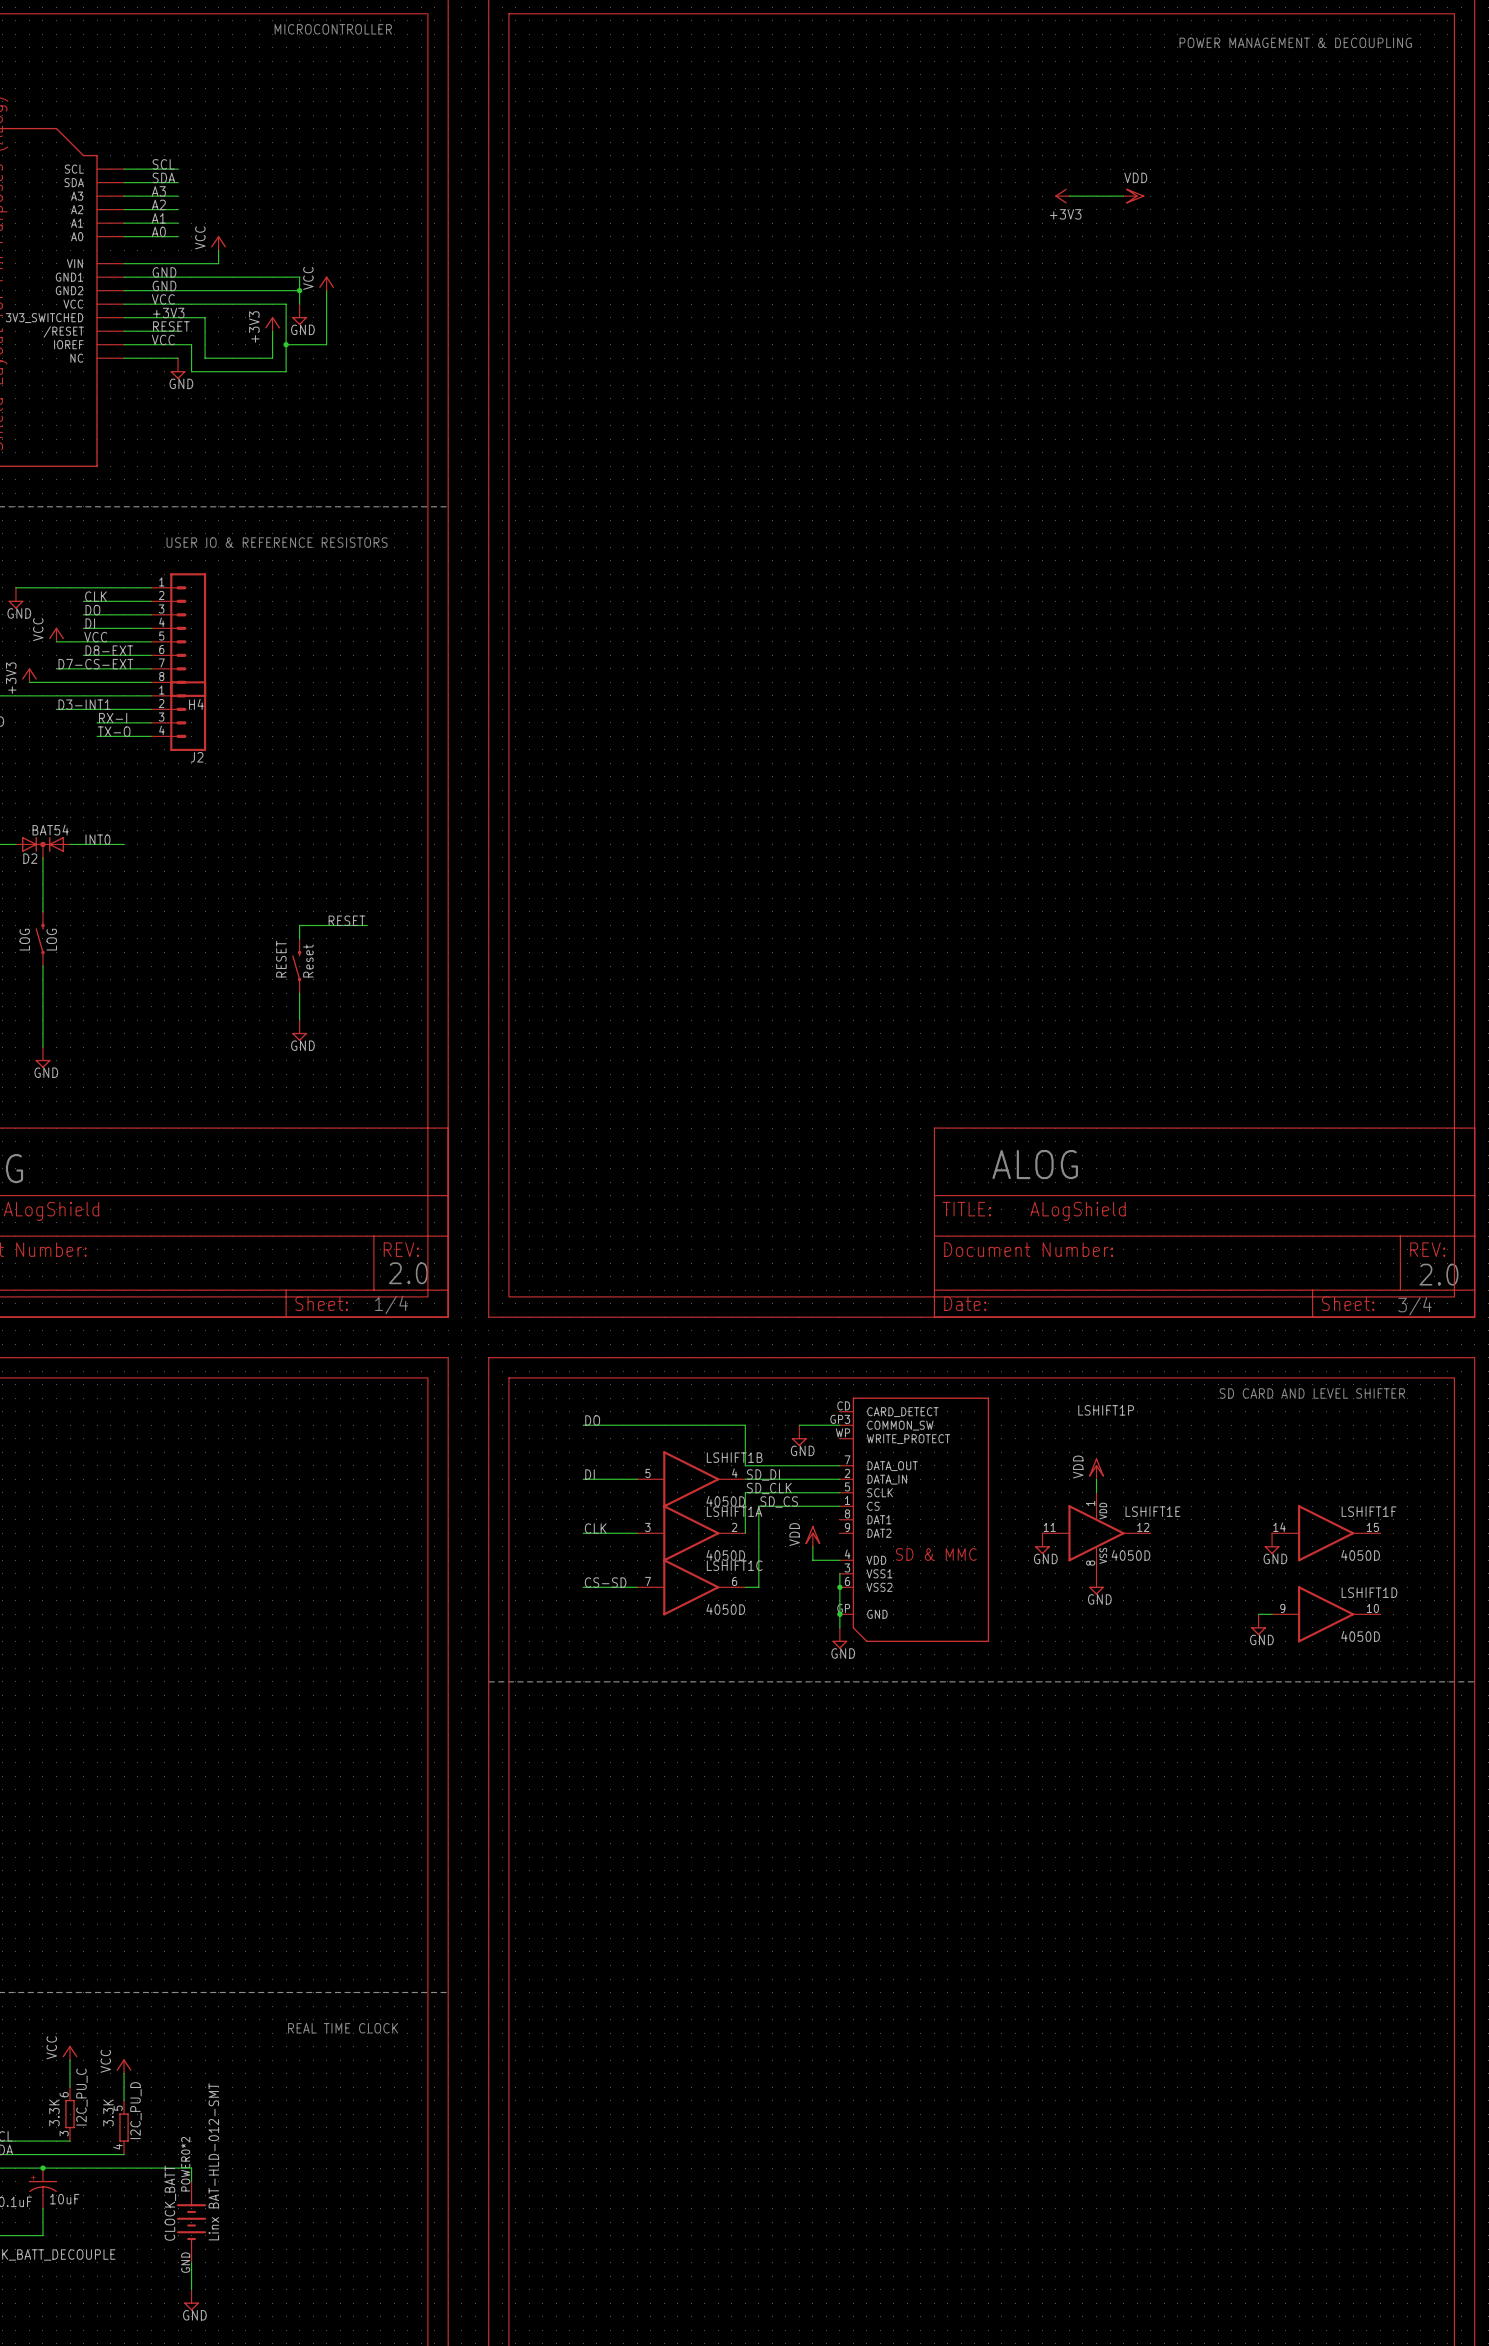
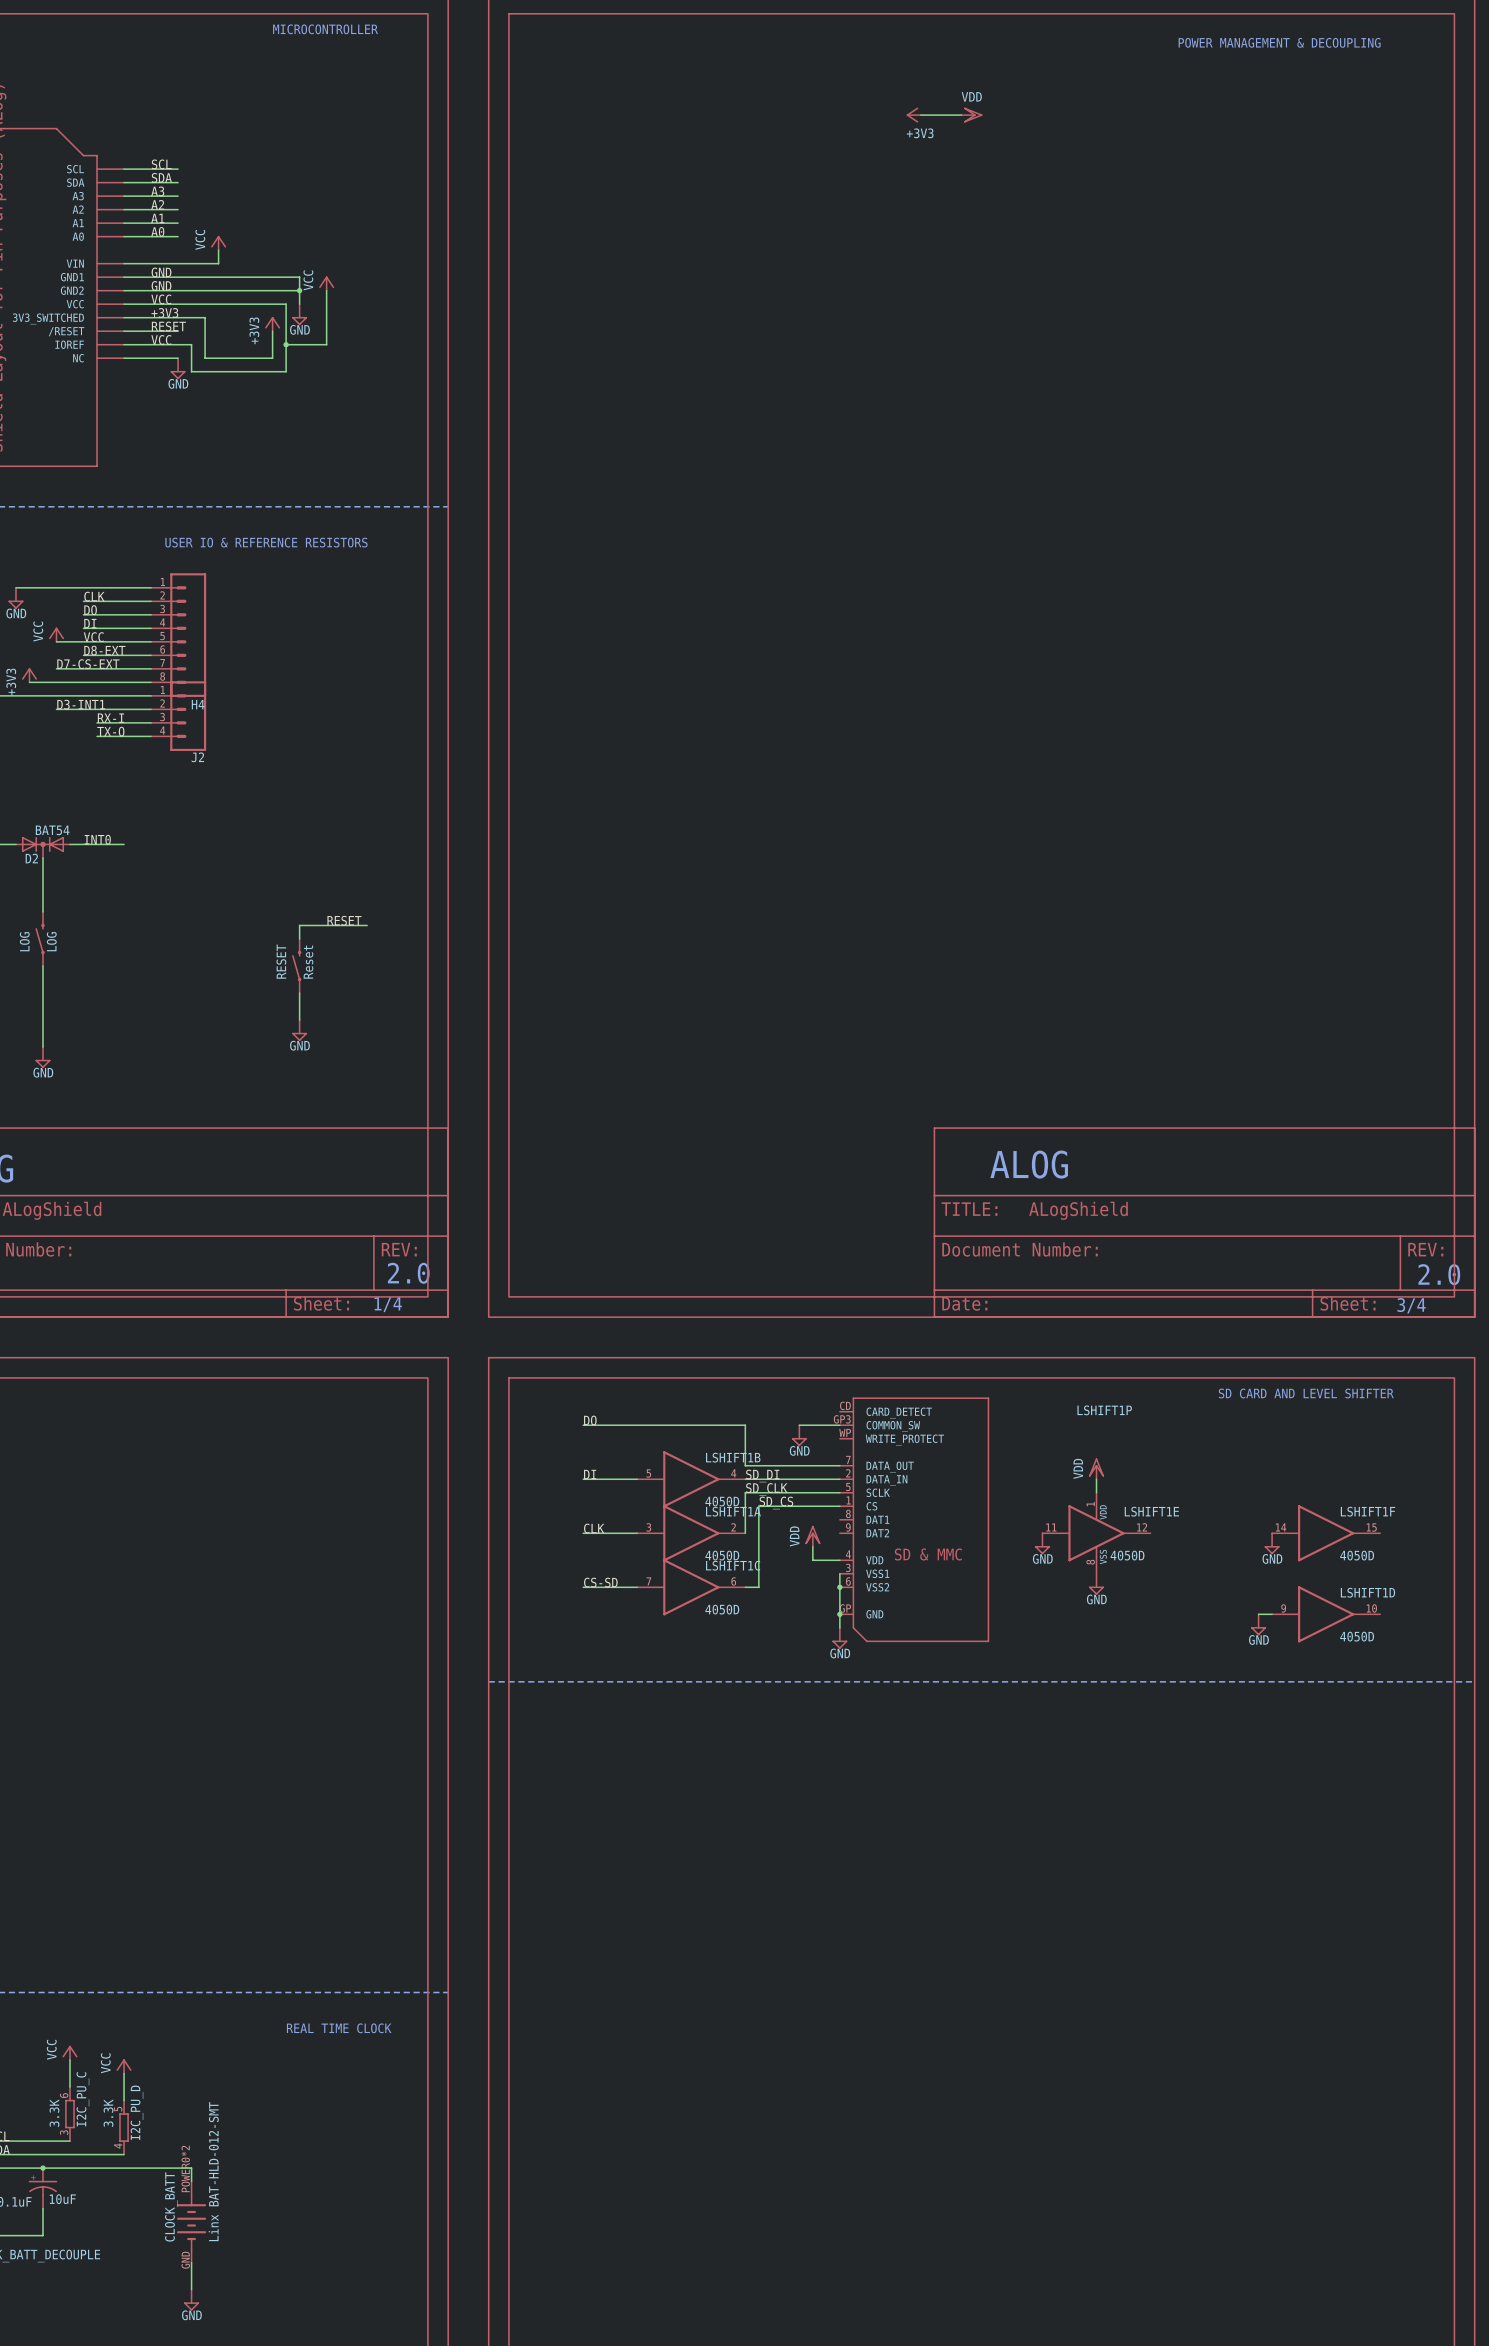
power symbol: none -> +3V3 (913, 115)
wire: none -> (920, 115) (961, 115)
power symbol: none -> VDD (971, 115)
power symbol: +3V3 (1062, 196) -> none
wire: (1069, 196) (1123, 196) -> none
power symbol: VDD (1133, 196) -> none

